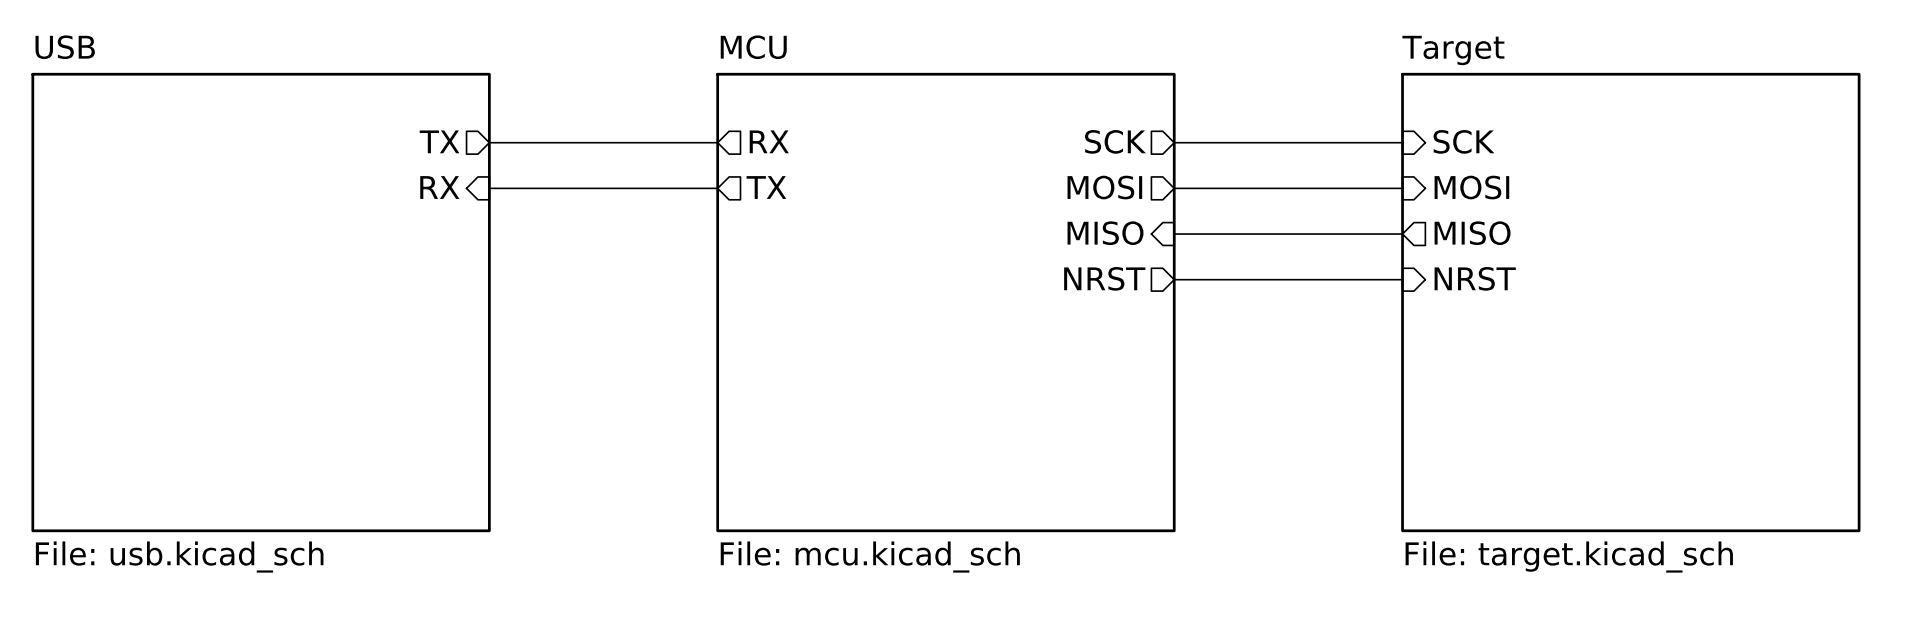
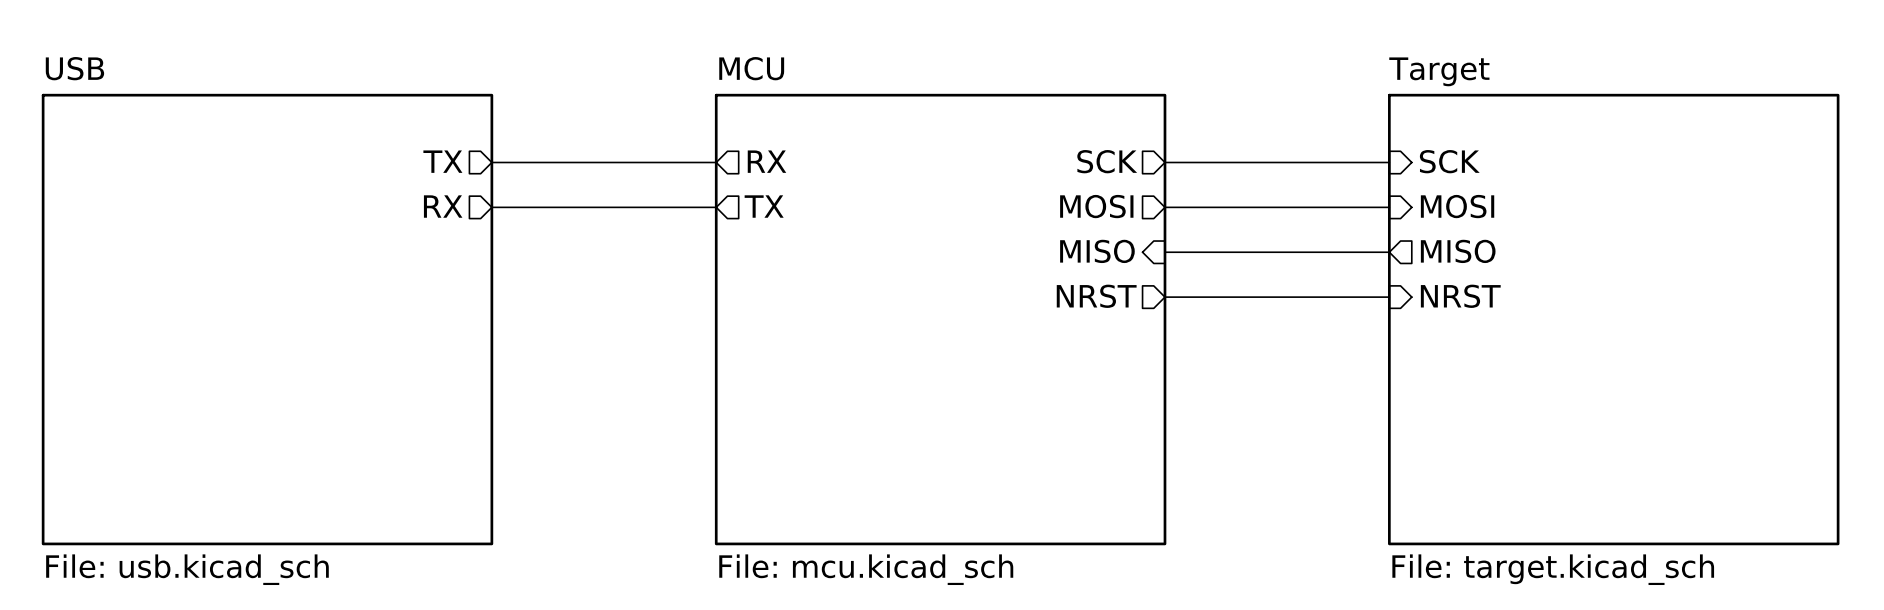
sheet pin shape: input (439, 187) -> output (443, 206)

